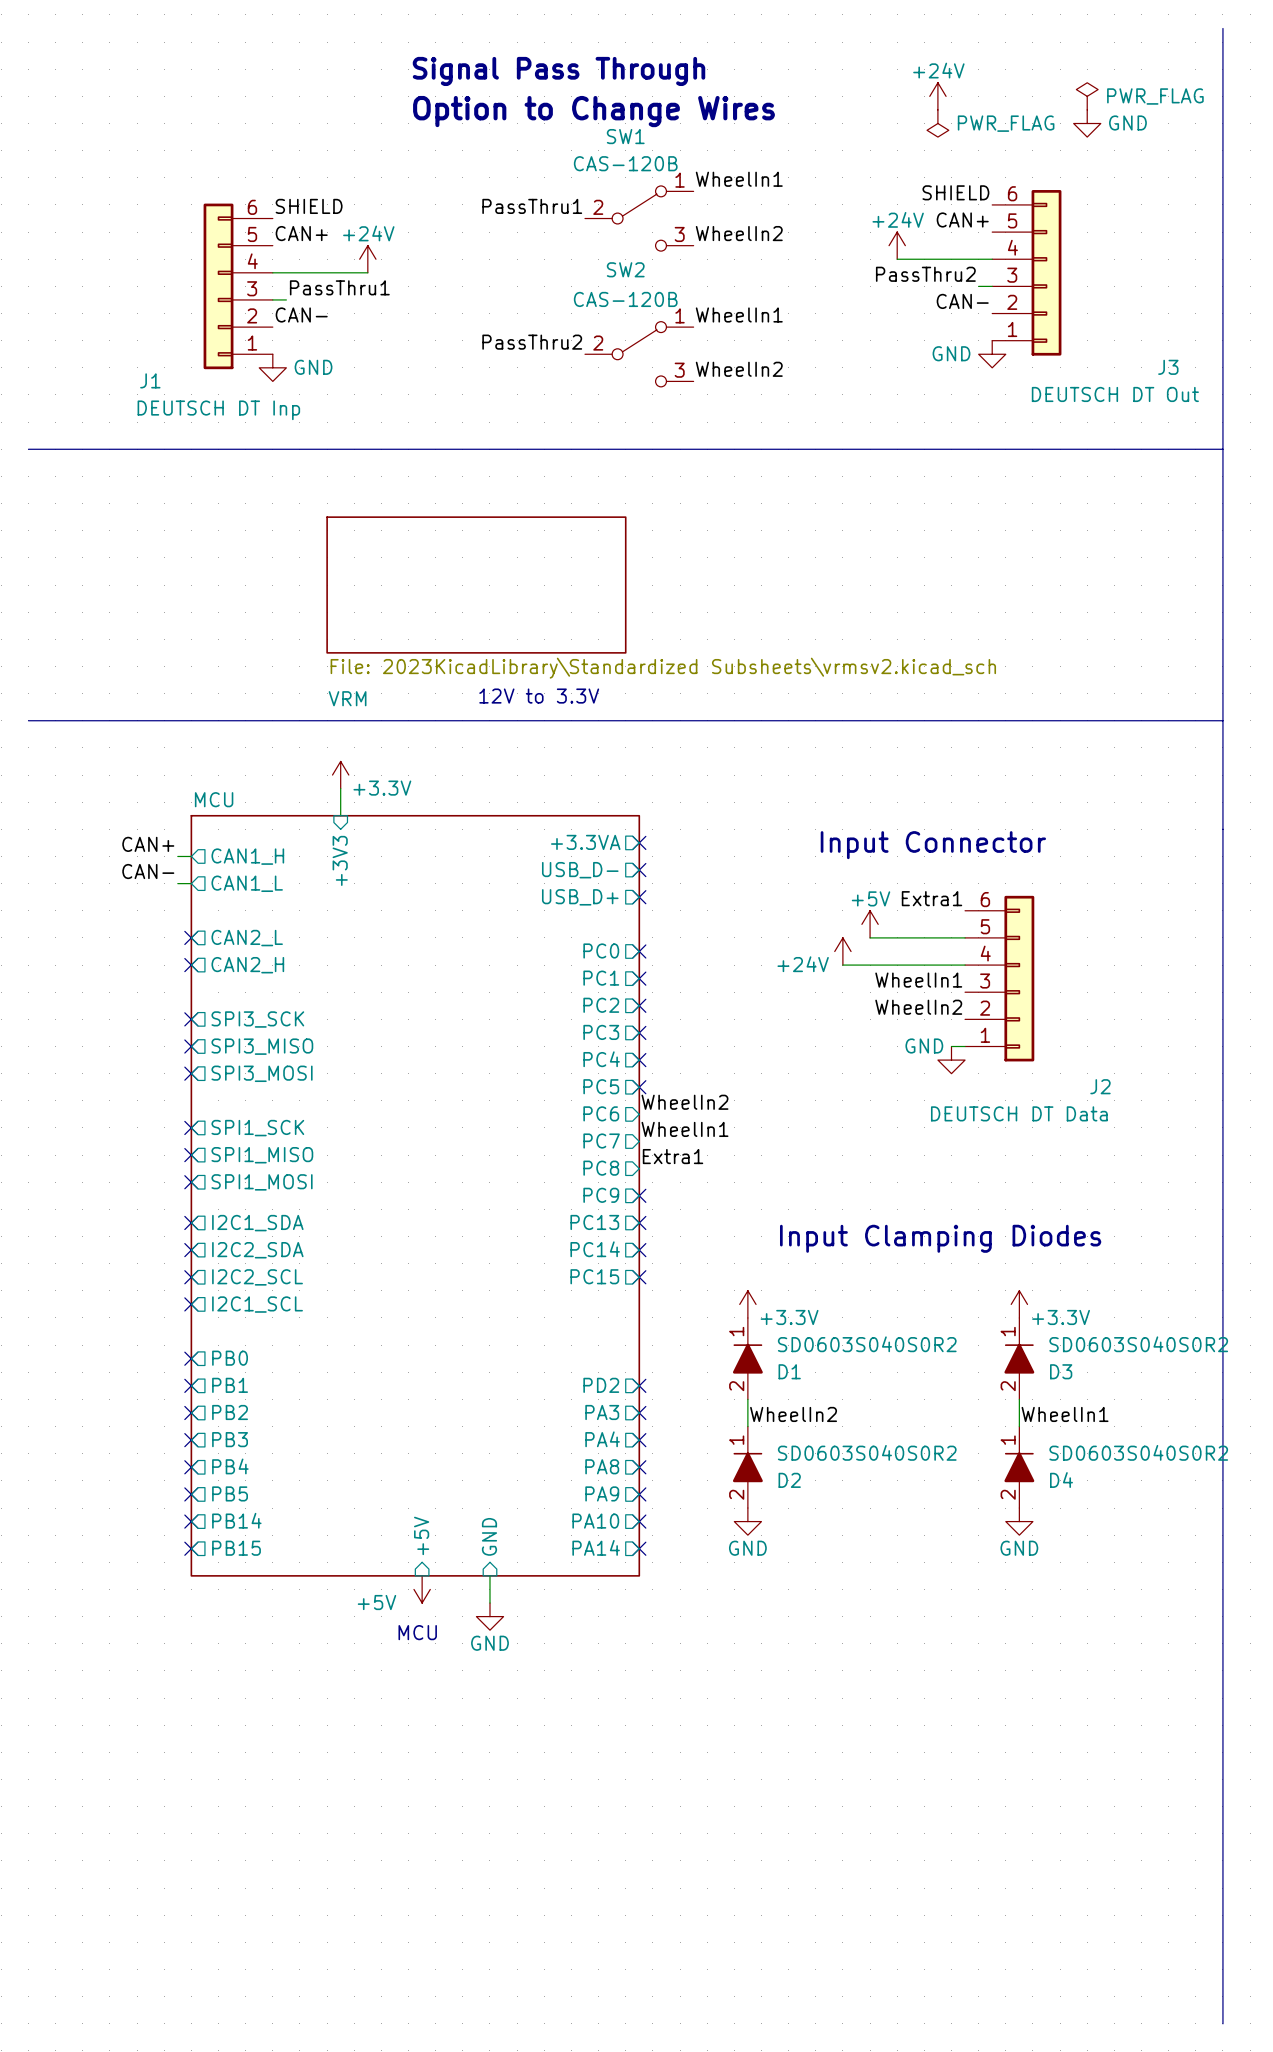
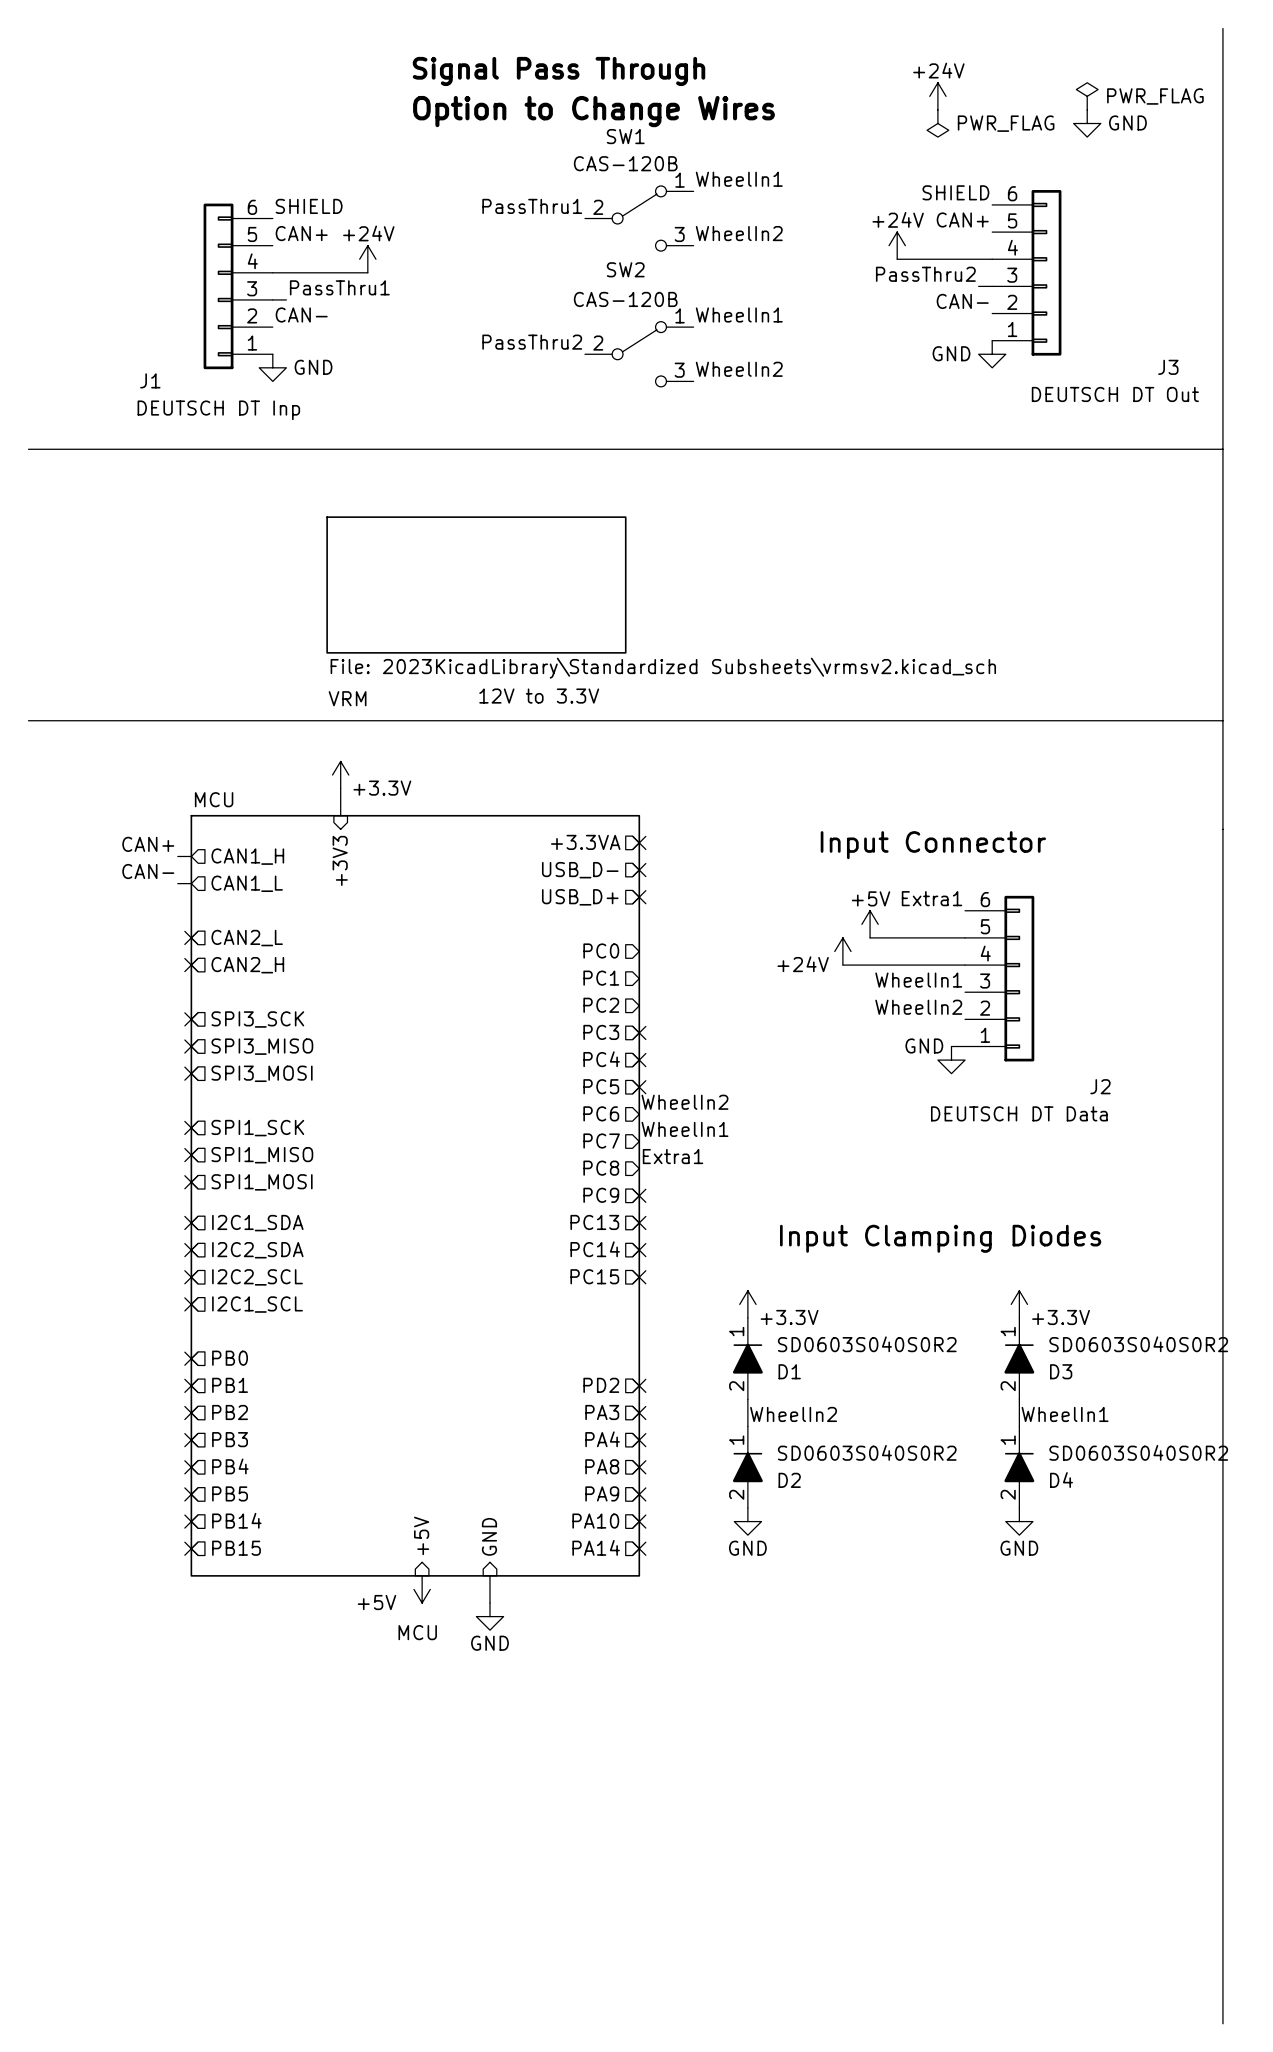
no-connect mark: (639, 951) -> none
no-connect mark: (639, 978) -> none
no-connect mark: (639, 1005) -> none

